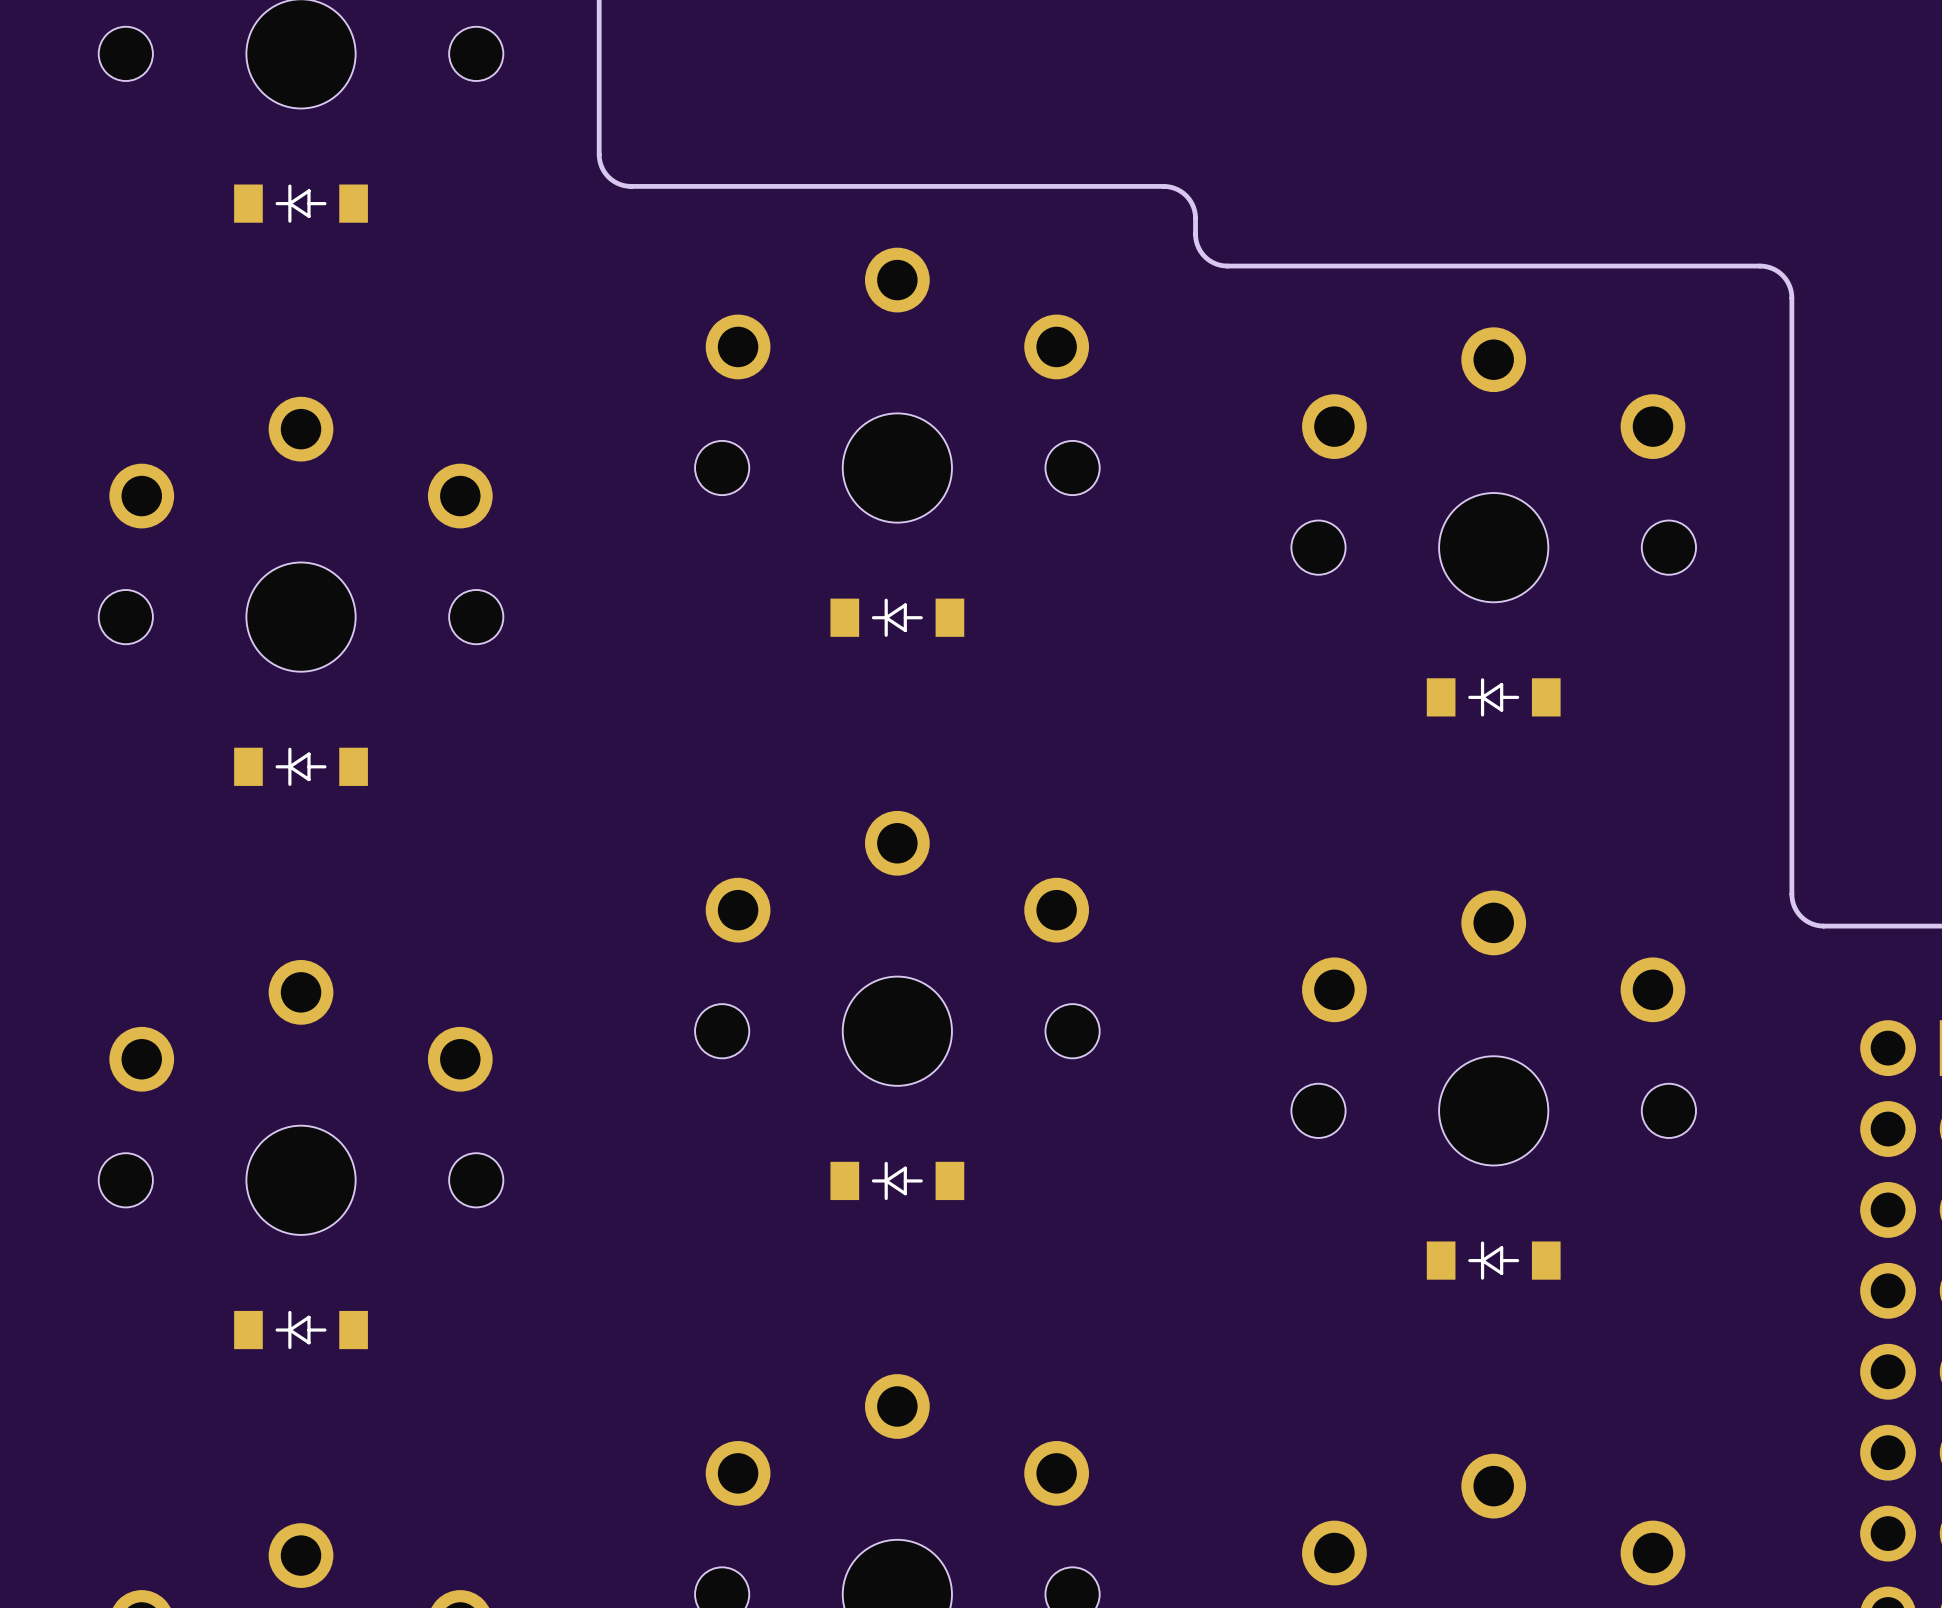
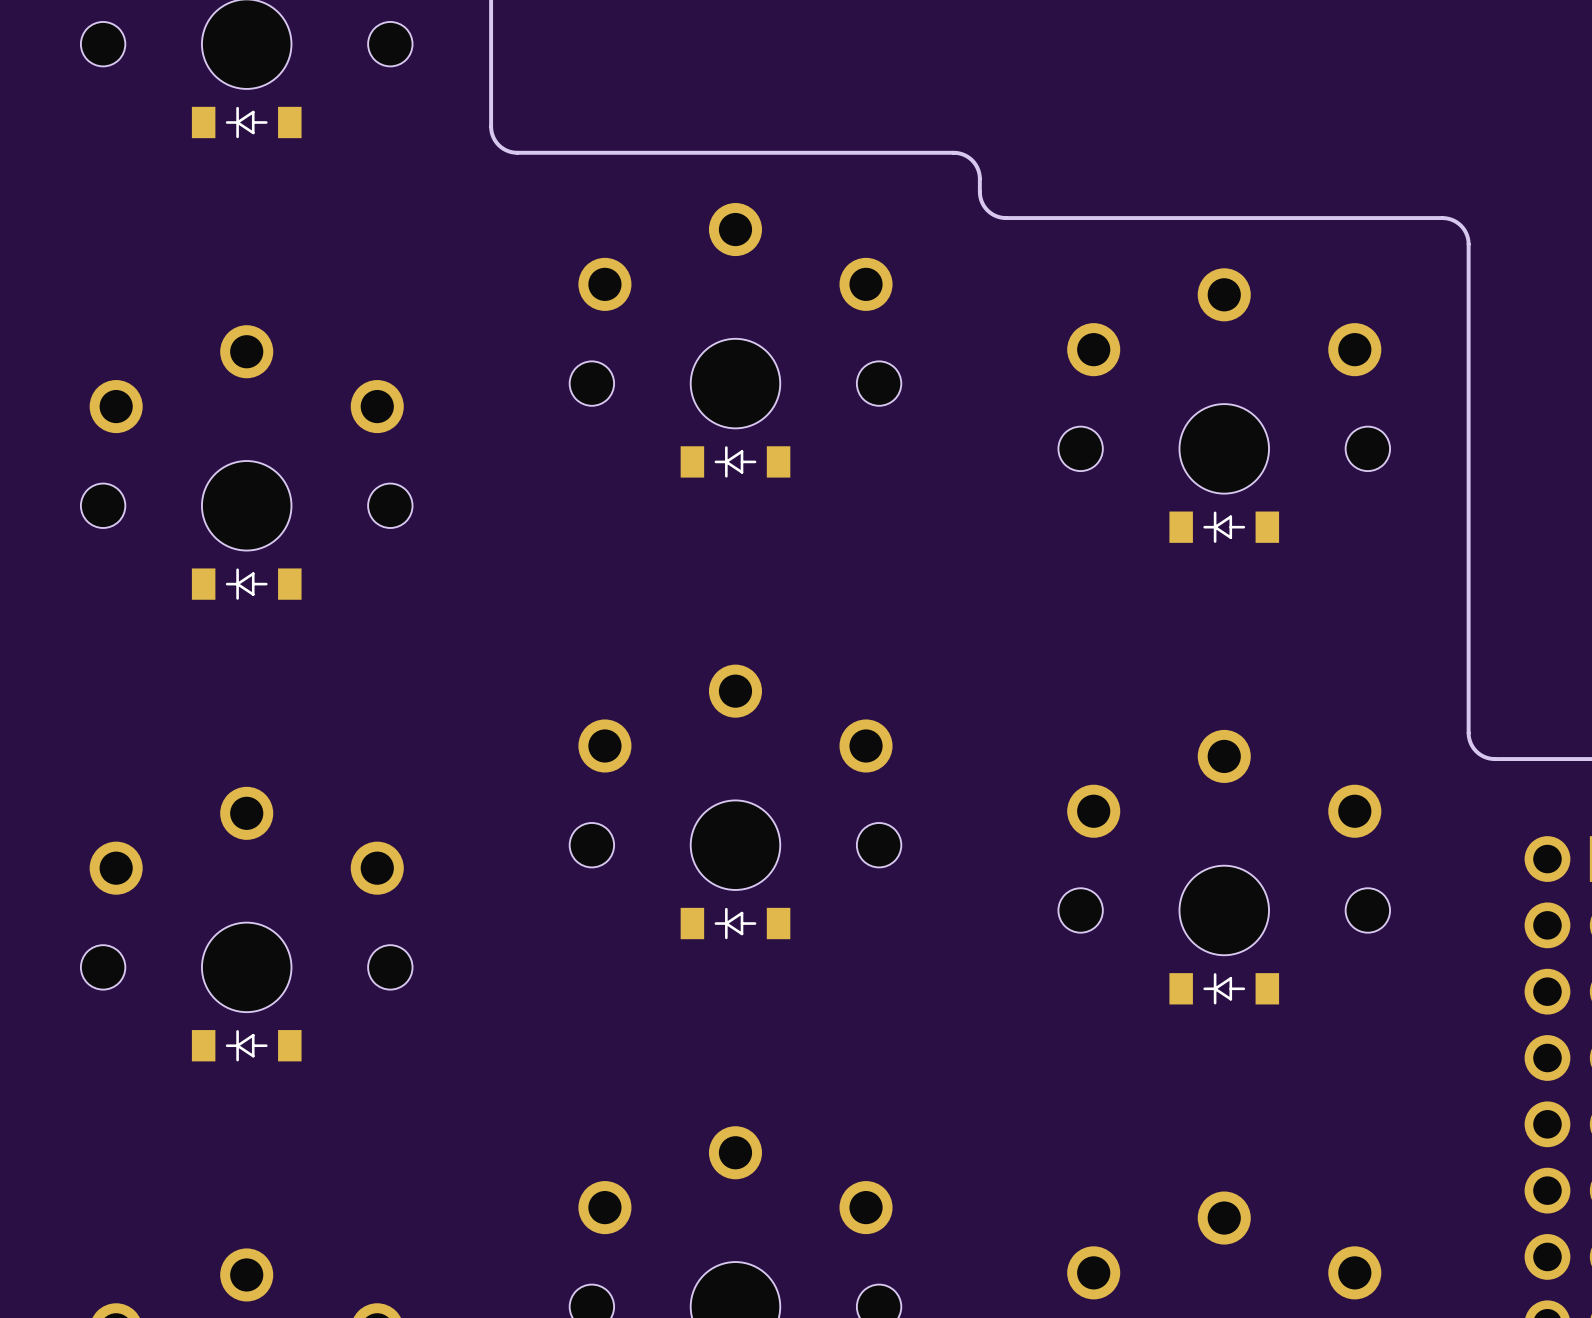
part position: (301, 203) -> (246, 122)
part position: (897, 617) -> (735, 461)
part position: (1493, 697) -> (1224, 527)
part position: (301, 766) -> (246, 584)
part position: (897, 1180) -> (735, 923)
part position: (1493, 1260) -> (1224, 988)
part position: (301, 1330) -> (246, 1045)

